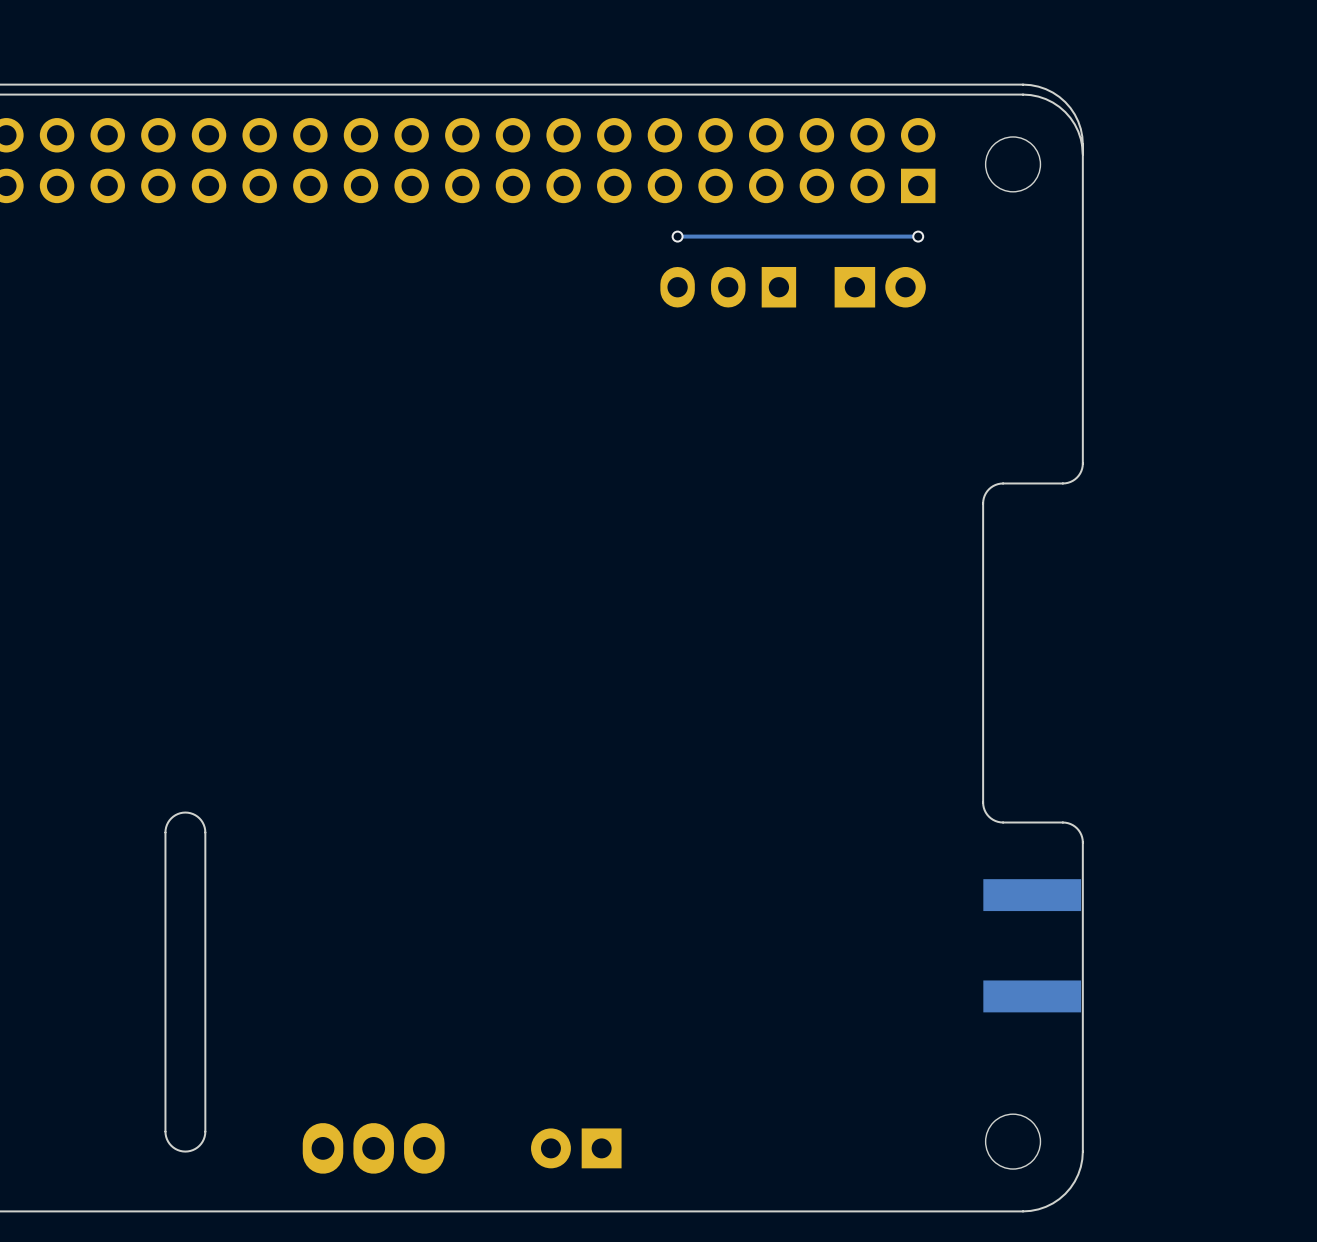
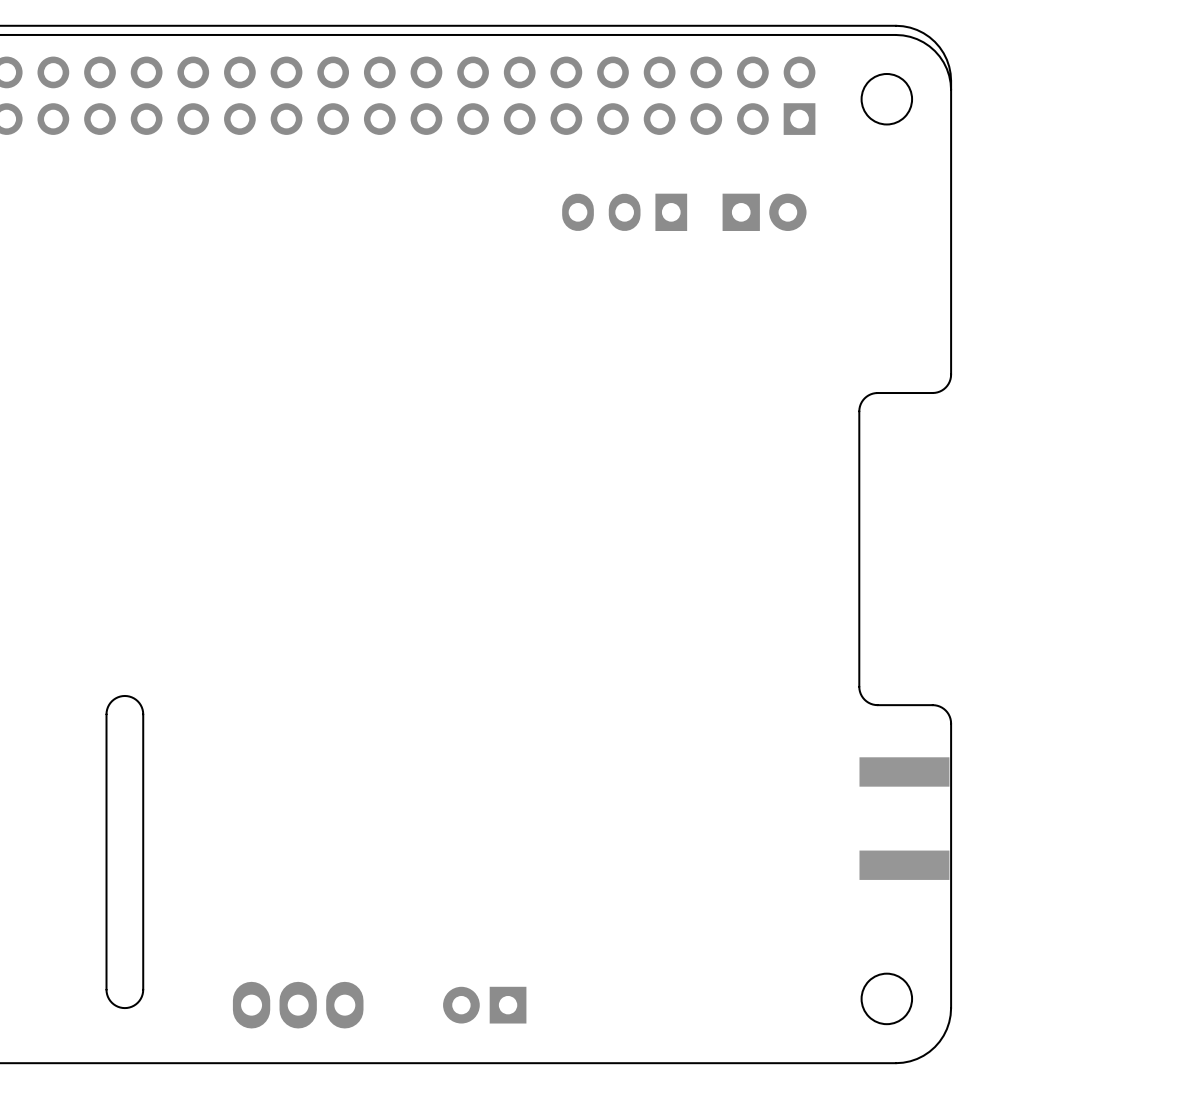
via: (677, 236) -> none
track: (918, 236) (677, 236) -> none
via: (918, 236) -> none

